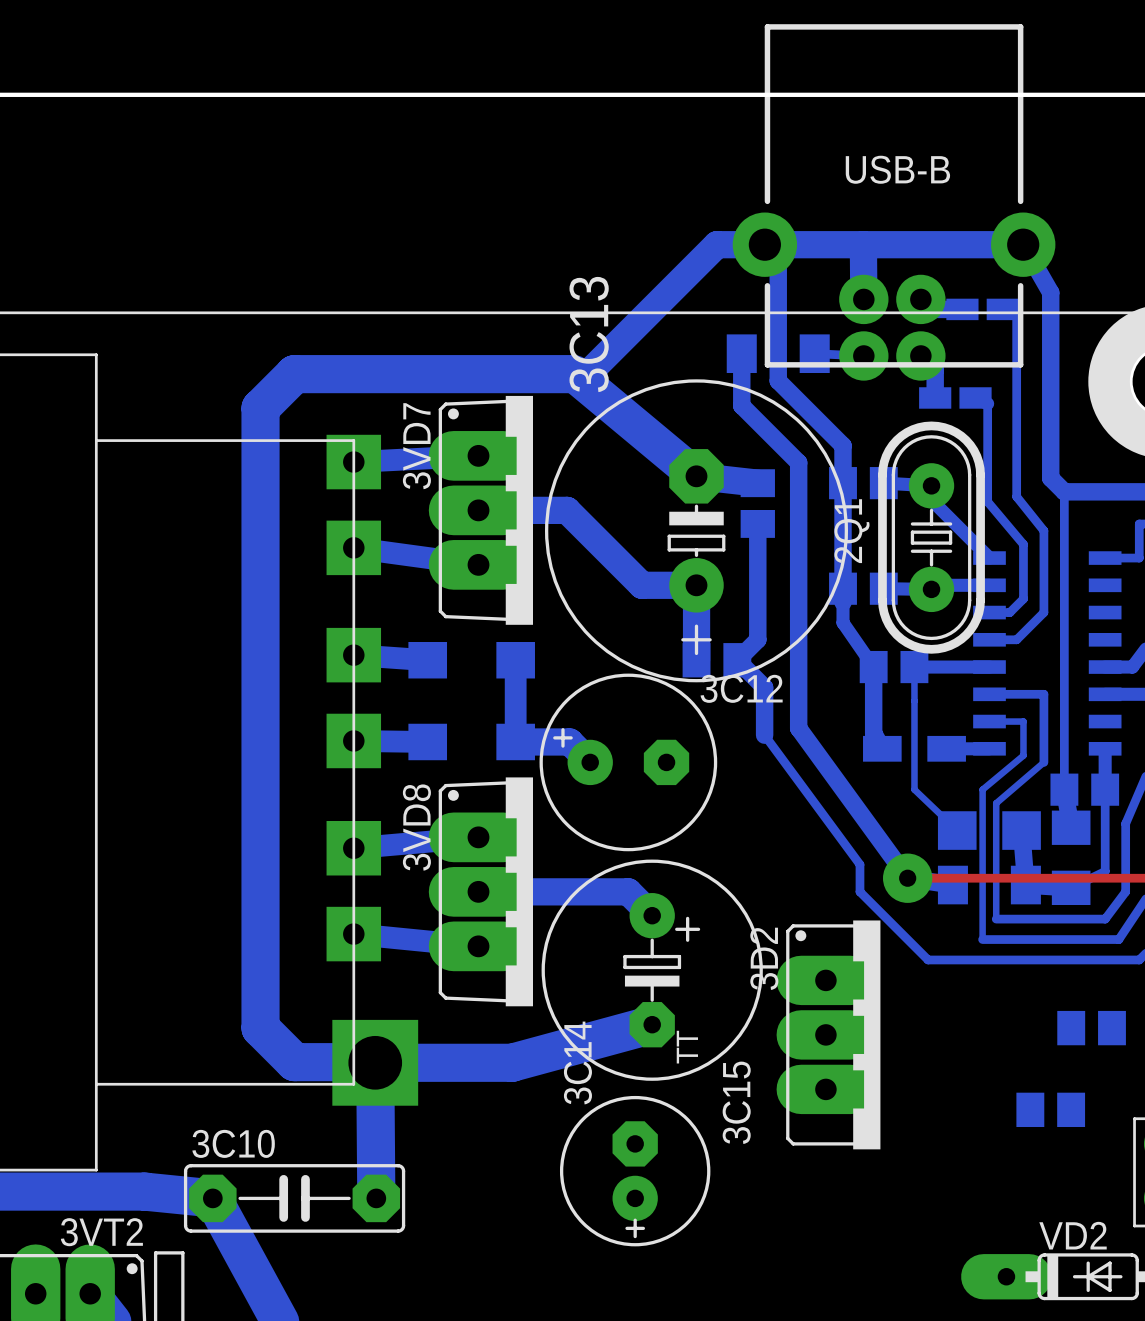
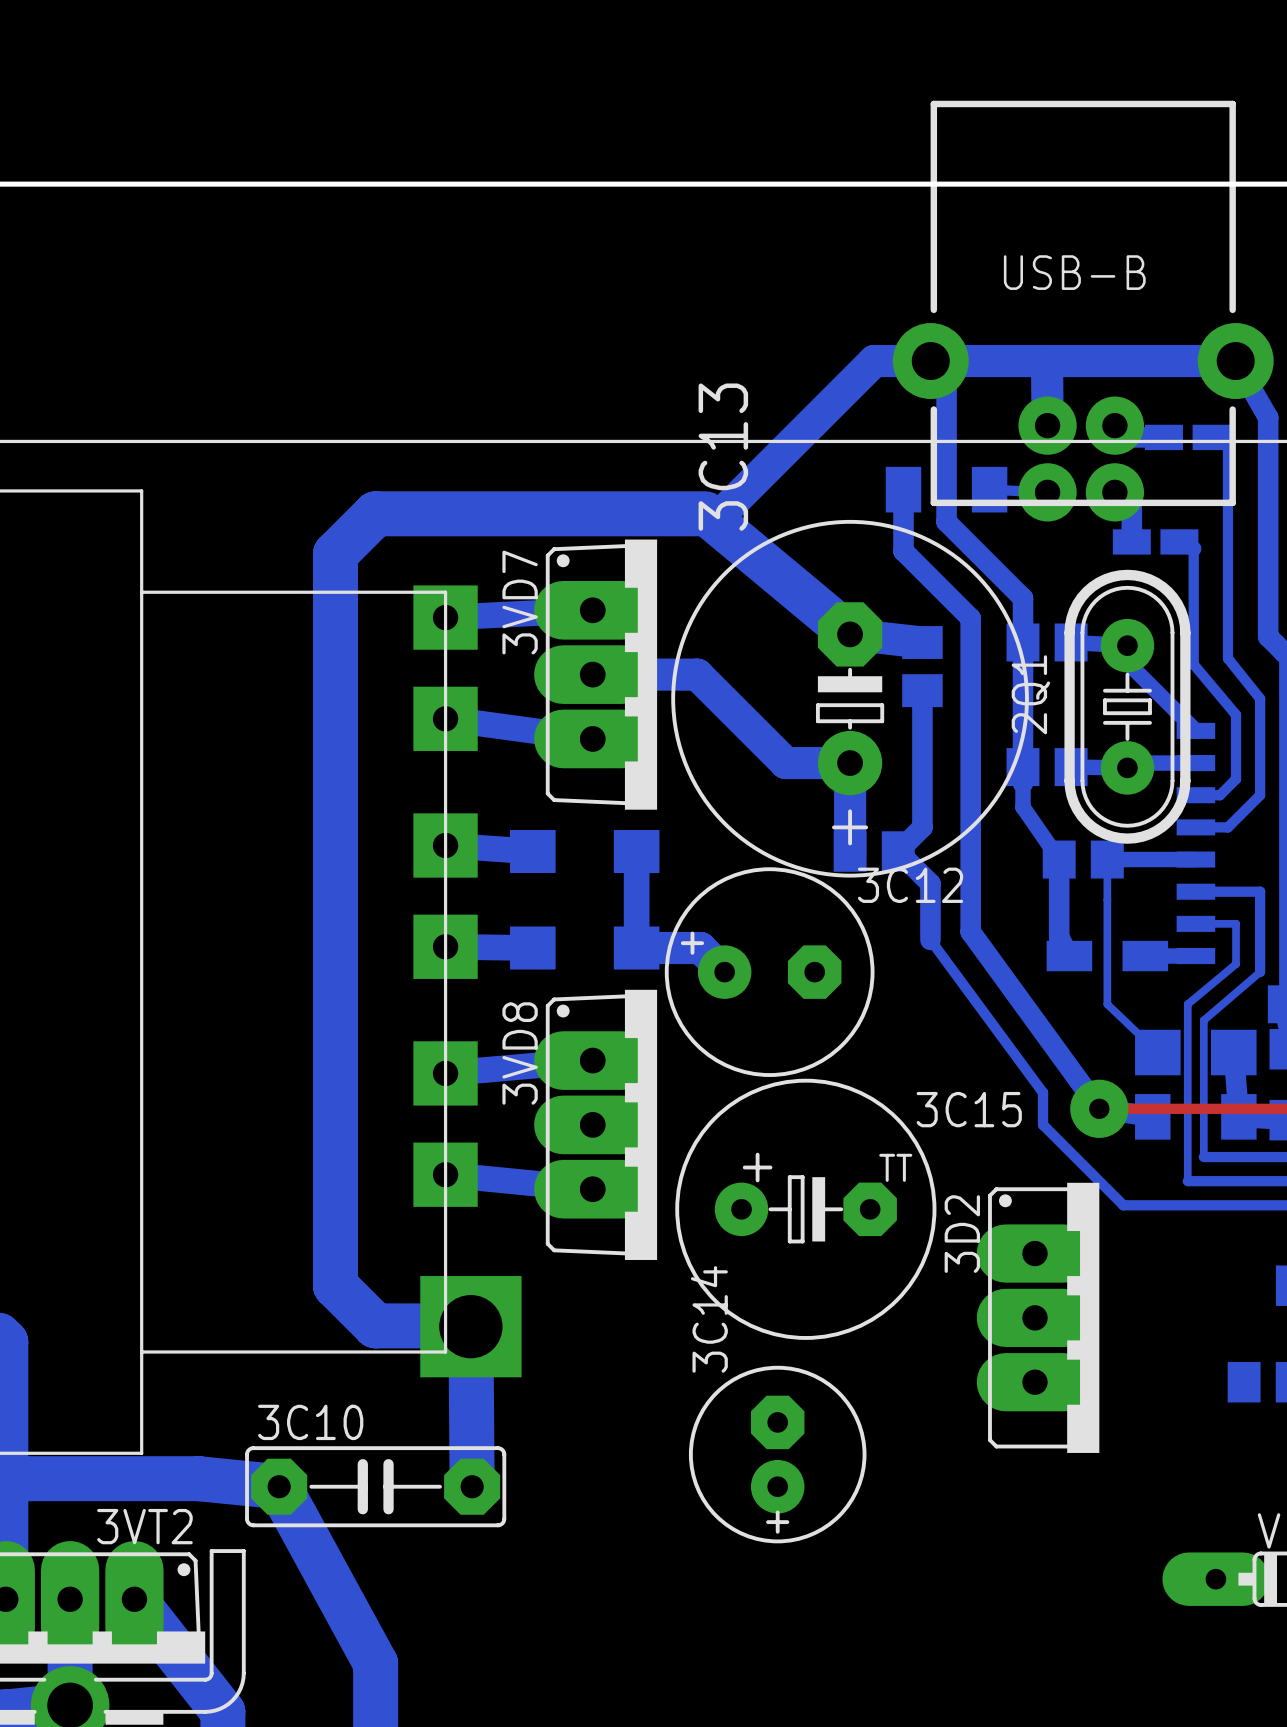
3C15 footprint: [541, 859, 763, 1081] -> [675, 1078, 937, 1340]
bottom track: (478, 891) (628, 891) (652, 915) -> none
bottom track: (652, 1024) (511, 1062) (375, 1062) -> none
3D2 position: (828, 1034) -> (1038, 1317)
3C15 name position: 3C15 (736, 1102) -> 3C15 (969, 1109)

